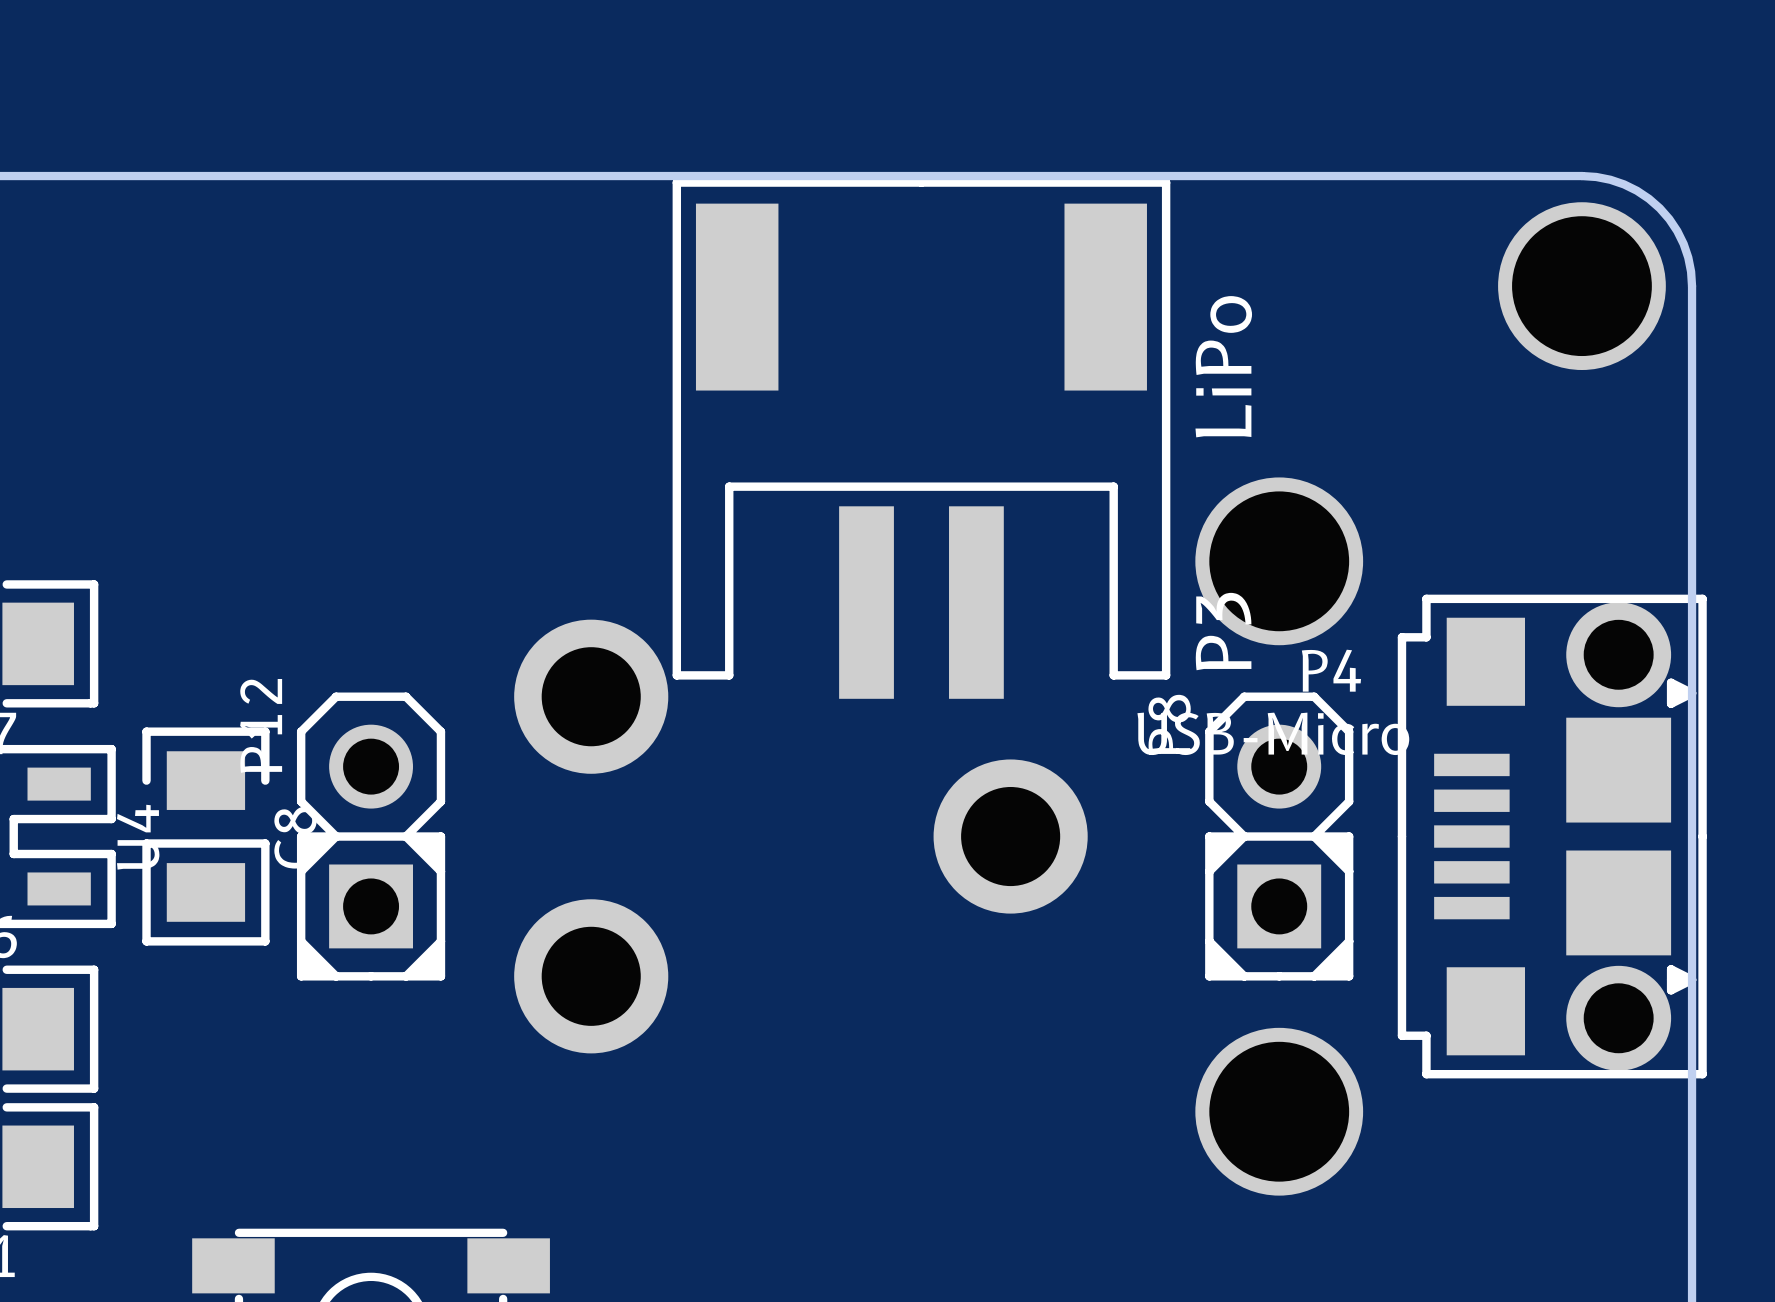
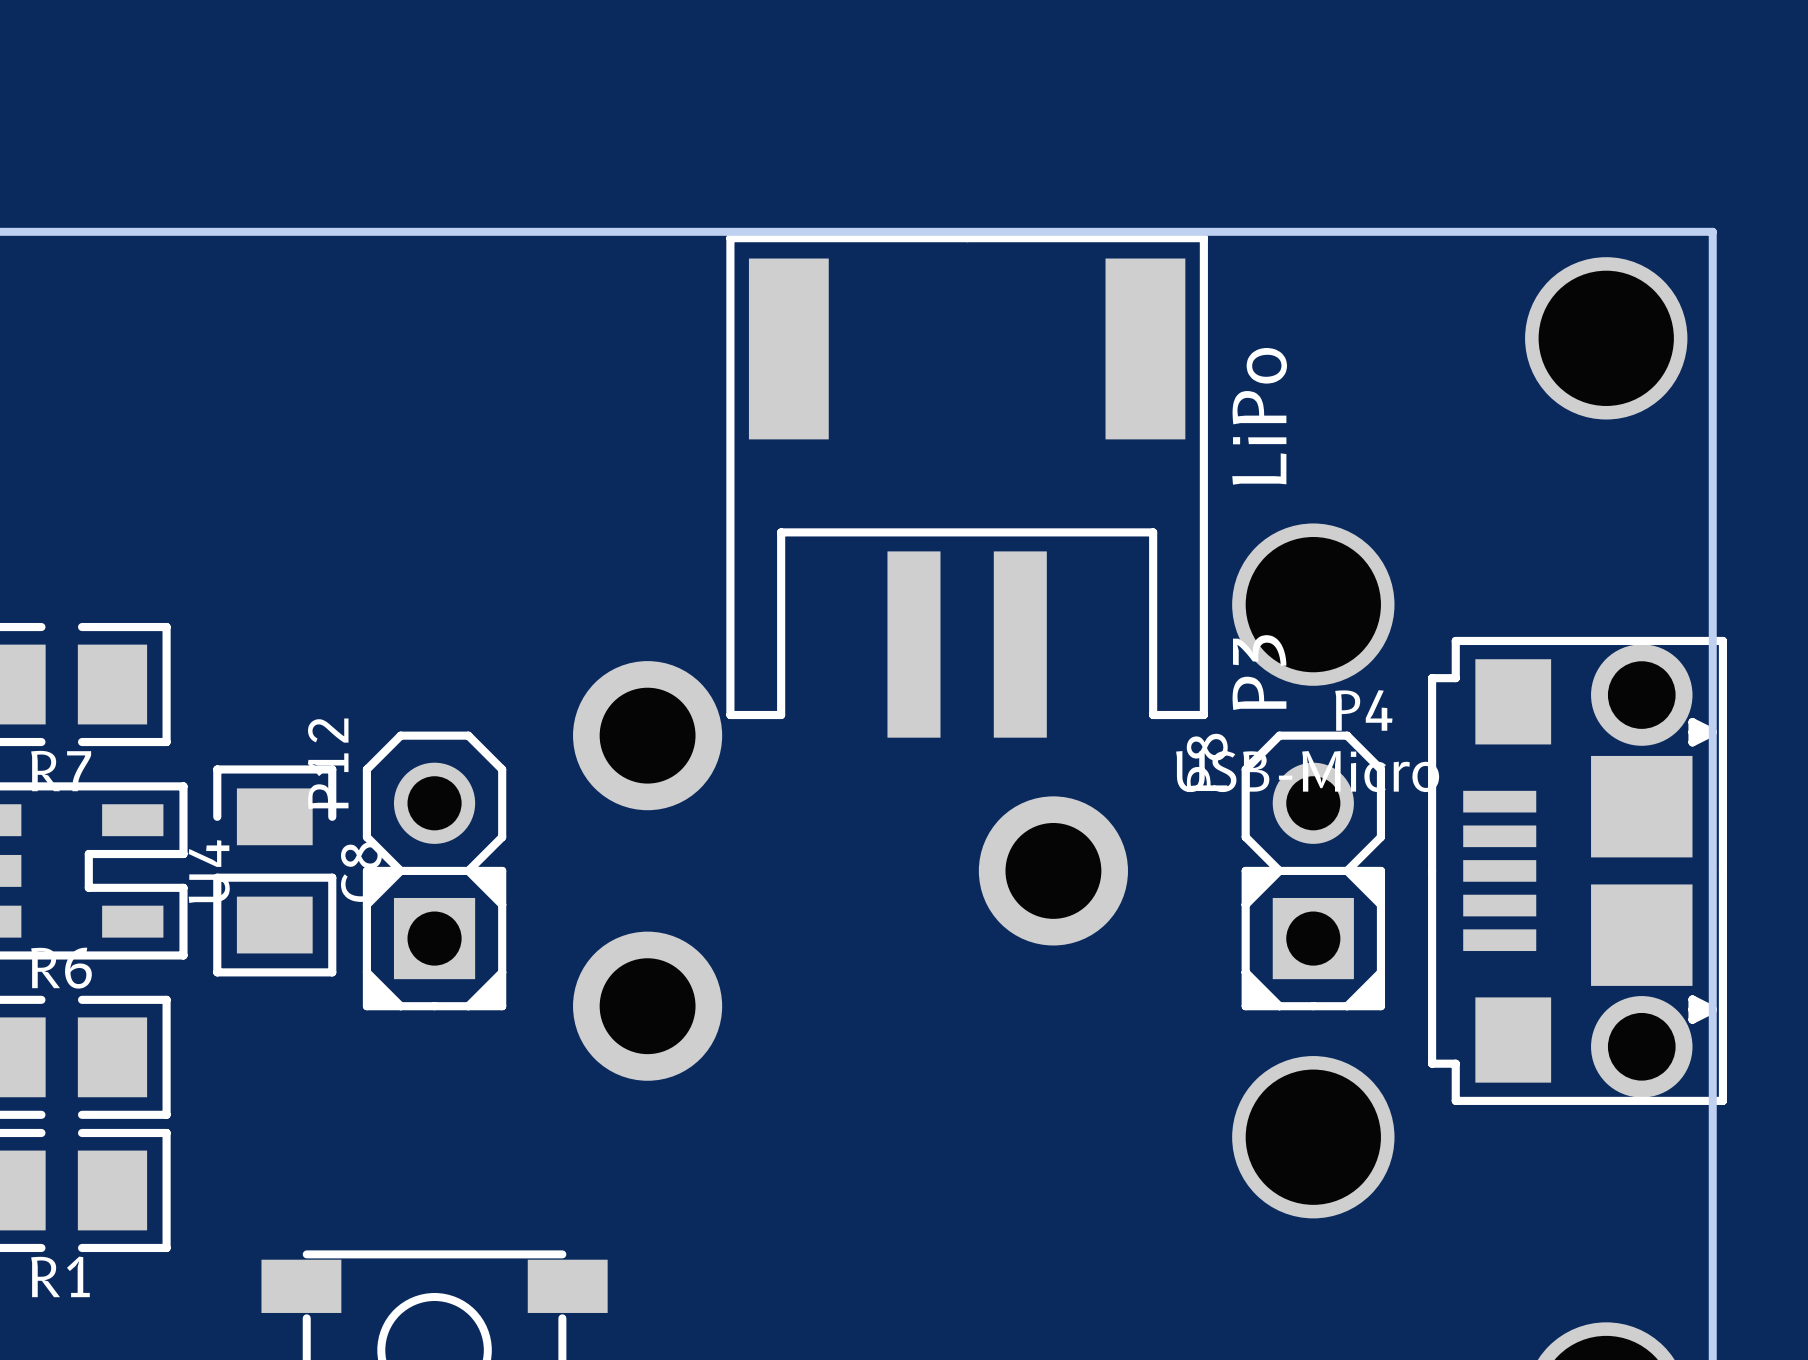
board edge: (1581, 176) (1610, 179) (1624, 184) (1648, 198) (1659, 208) (1677, 231) (1683, 243) (1688, 257) (1692, 286) -> (1606, 231) (1712, 231) (1712, 338)

